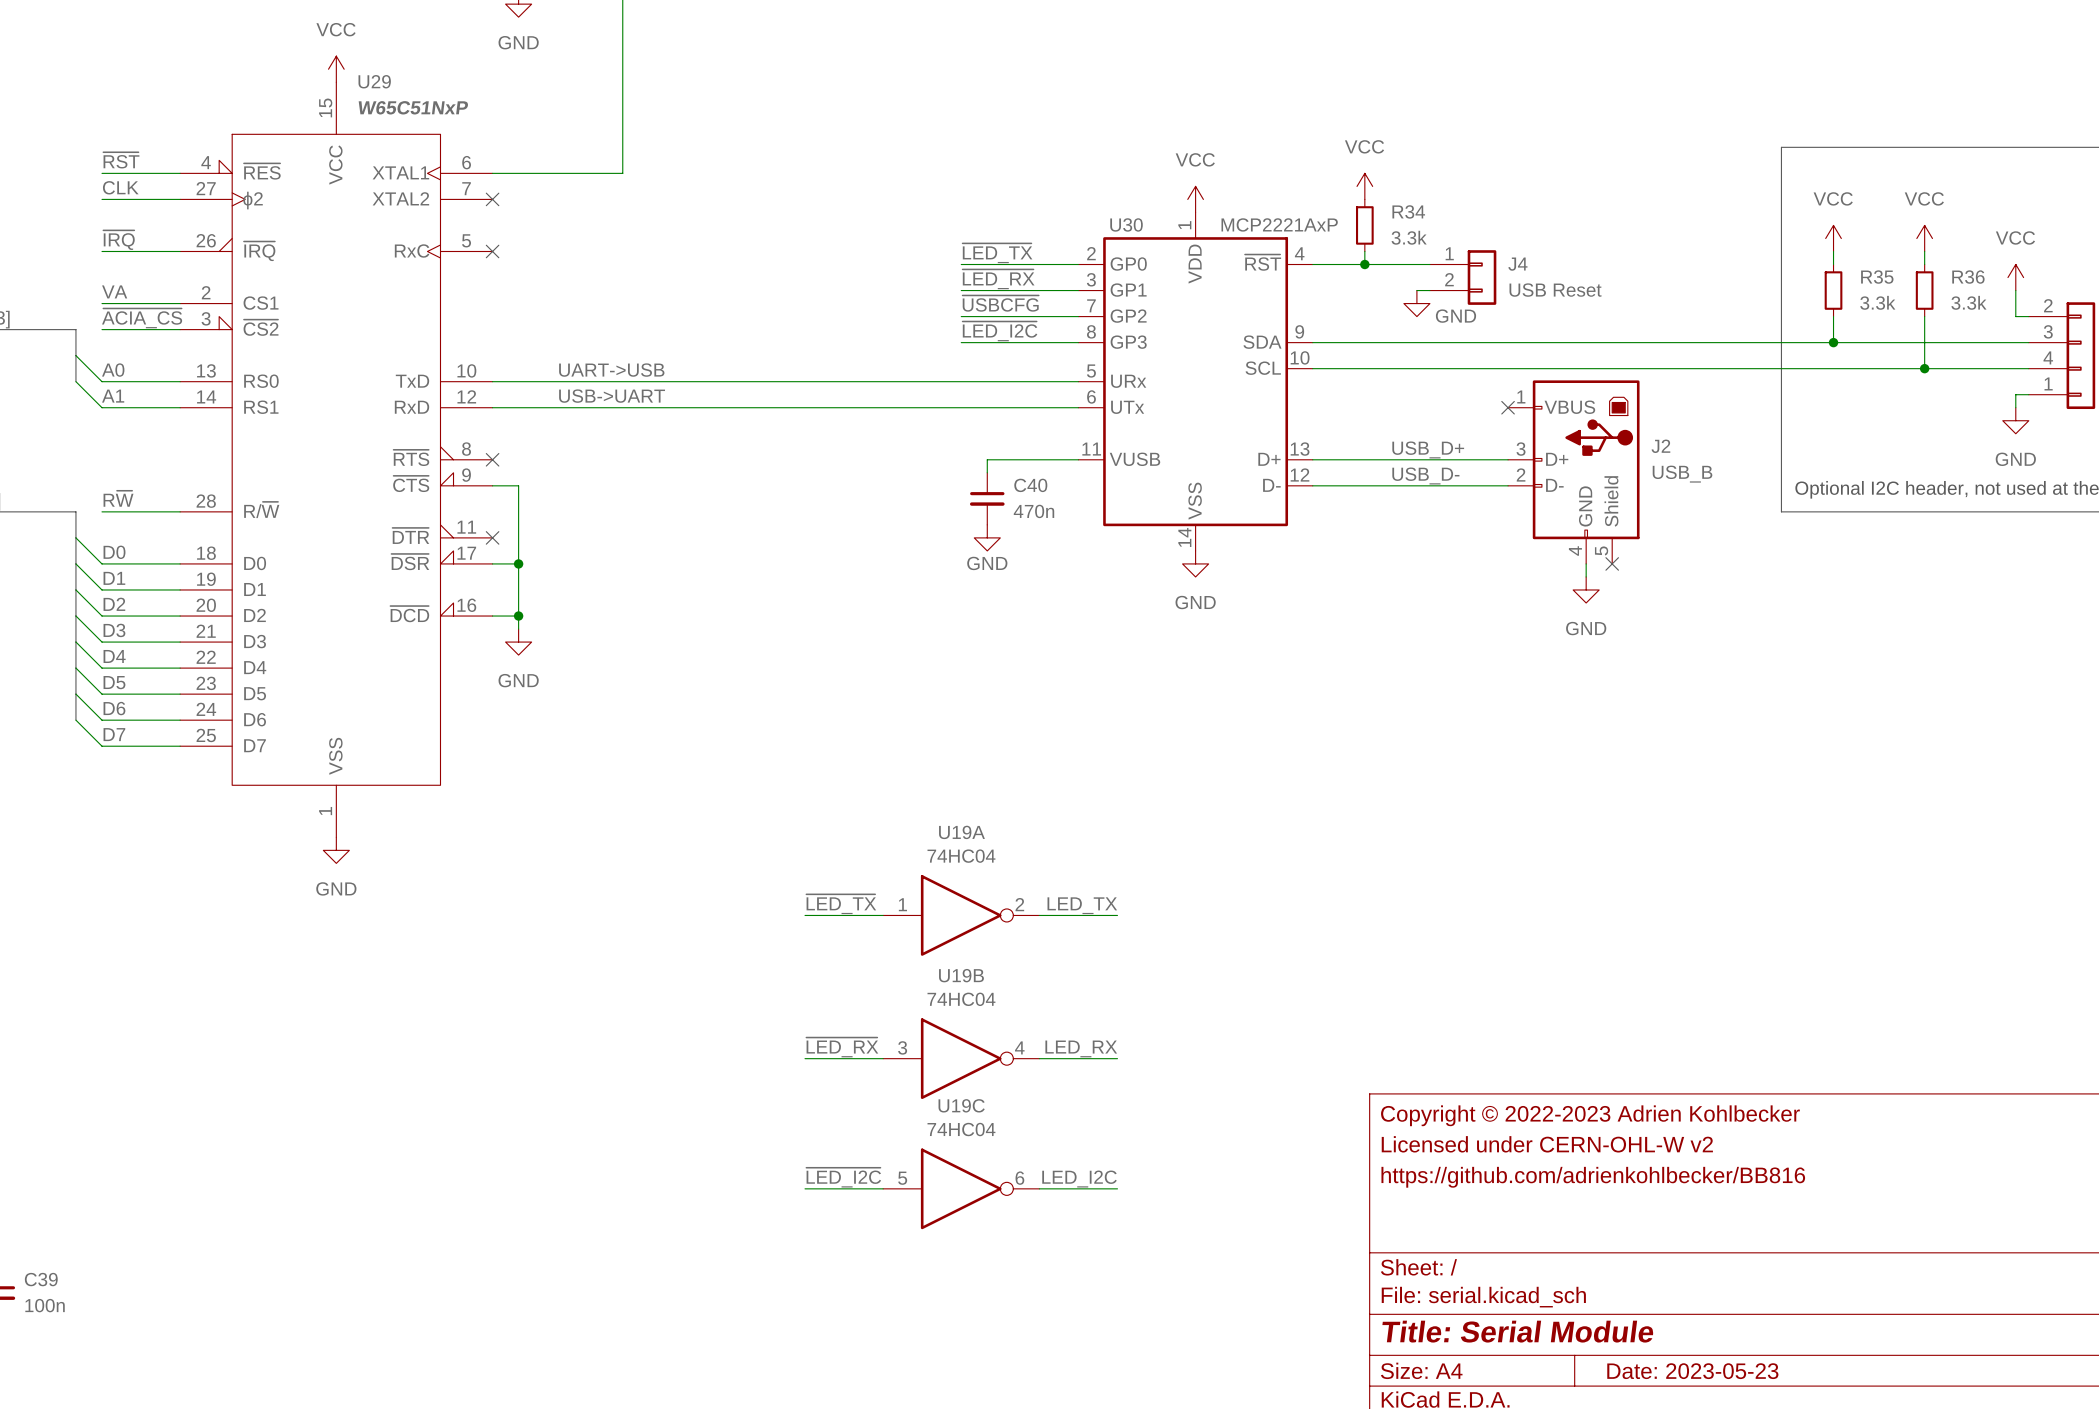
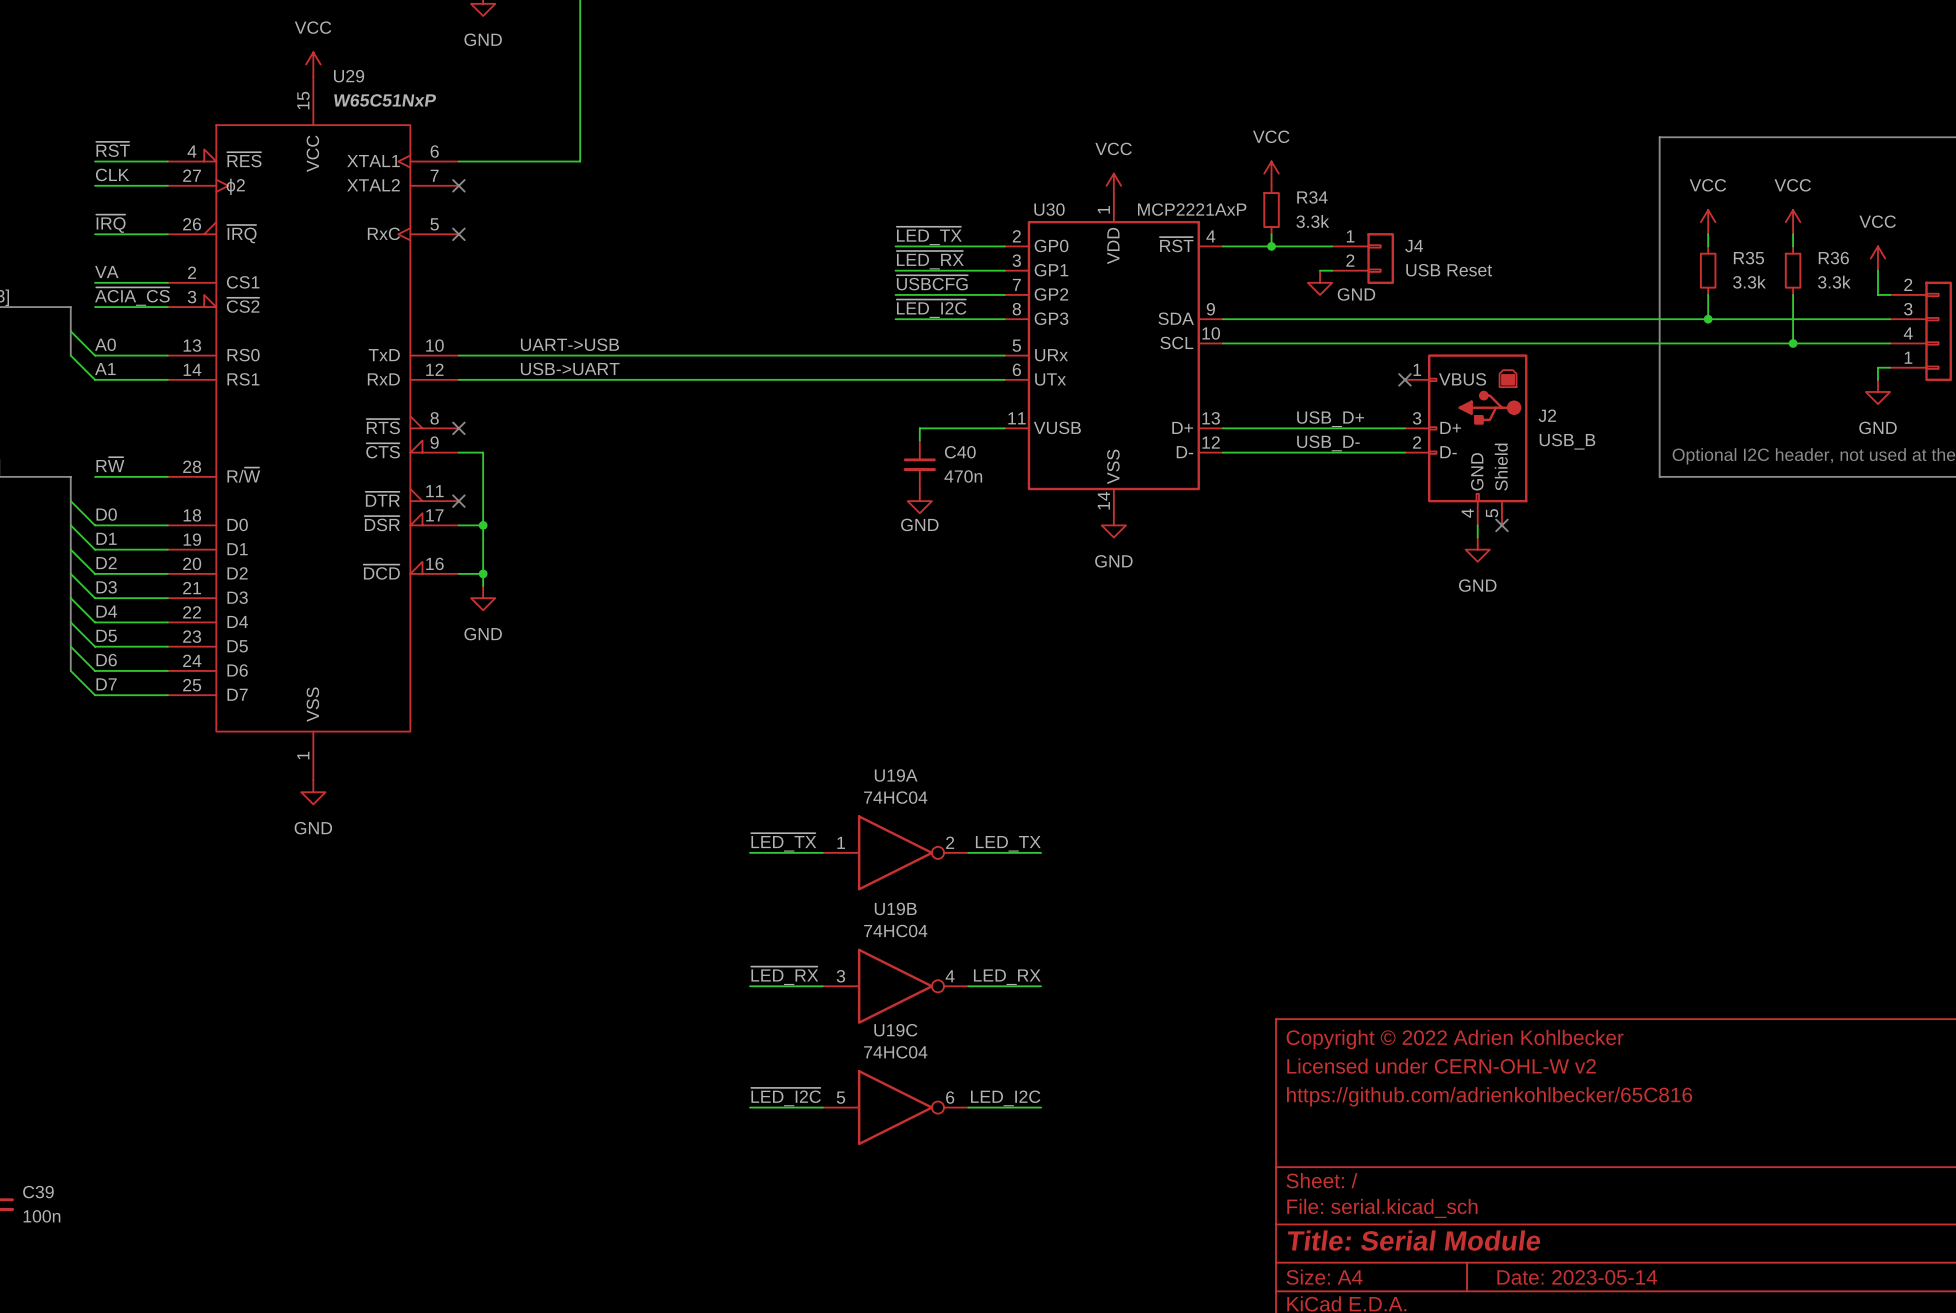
title block: Copyright © 2022-2023 Adrien Kohlbecker (1590, 1115) -> Copyright © 2022 Adrien Kohlbecker (1455, 1039)
title block: https://github.com/adrienkohlbecker/BB816 (1593, 1177) -> https://github.com/adrienkohlbecker/65C816 (1489, 1096)
title block: Date: 2023-05-23 (1692, 1371) -> Date: 2023-05-14 (1577, 1277)

